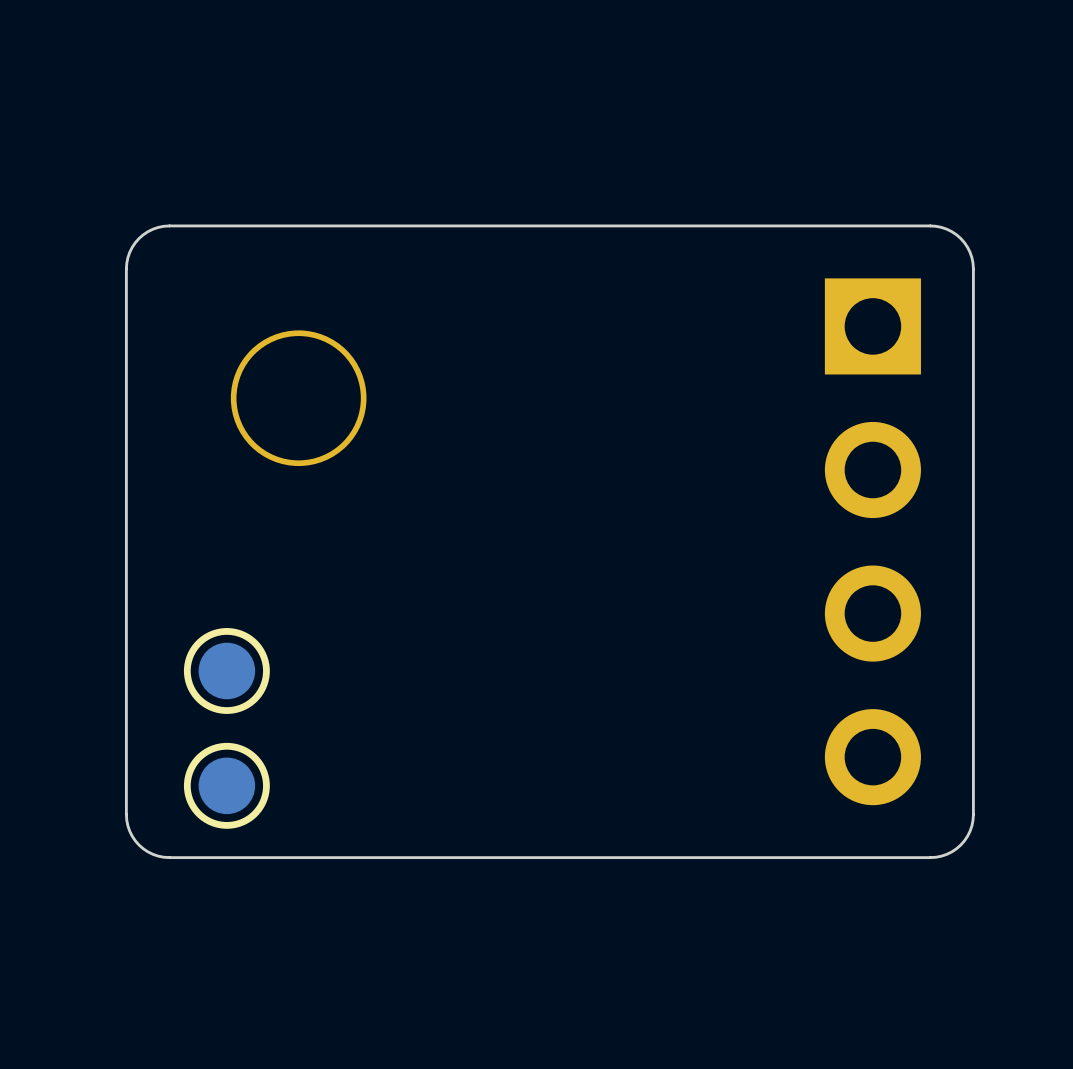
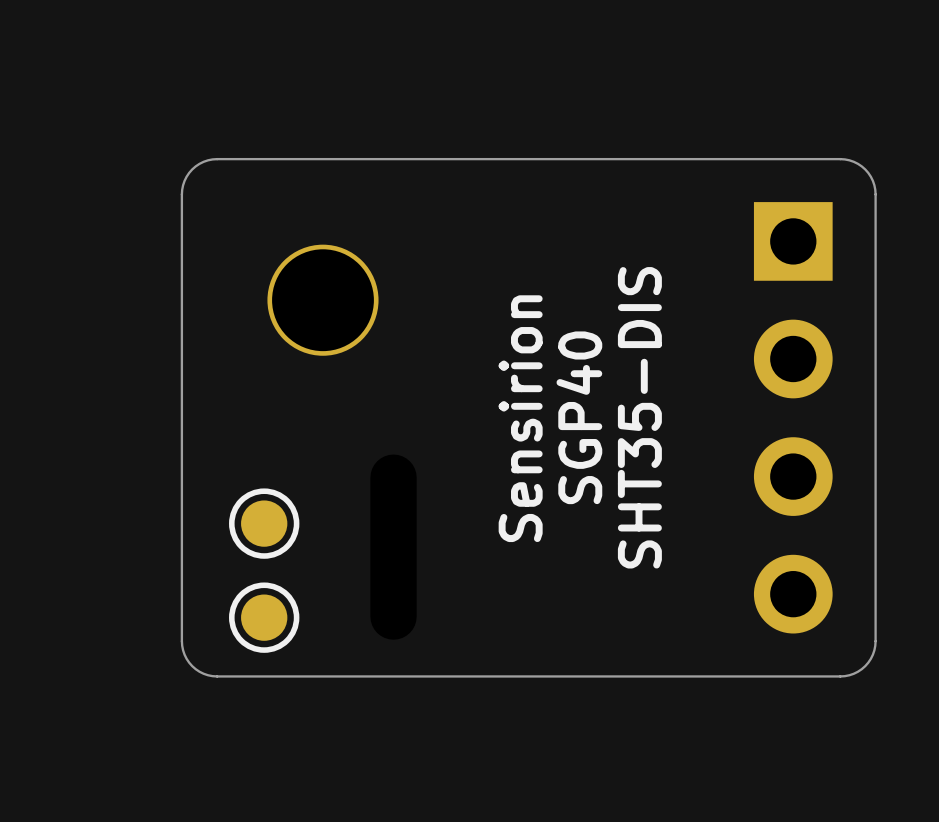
text: none -> SHT35-DIS (639, 417)
text: none -> Sensirion (520, 418)
text: none -> SGP40 (579, 417)

